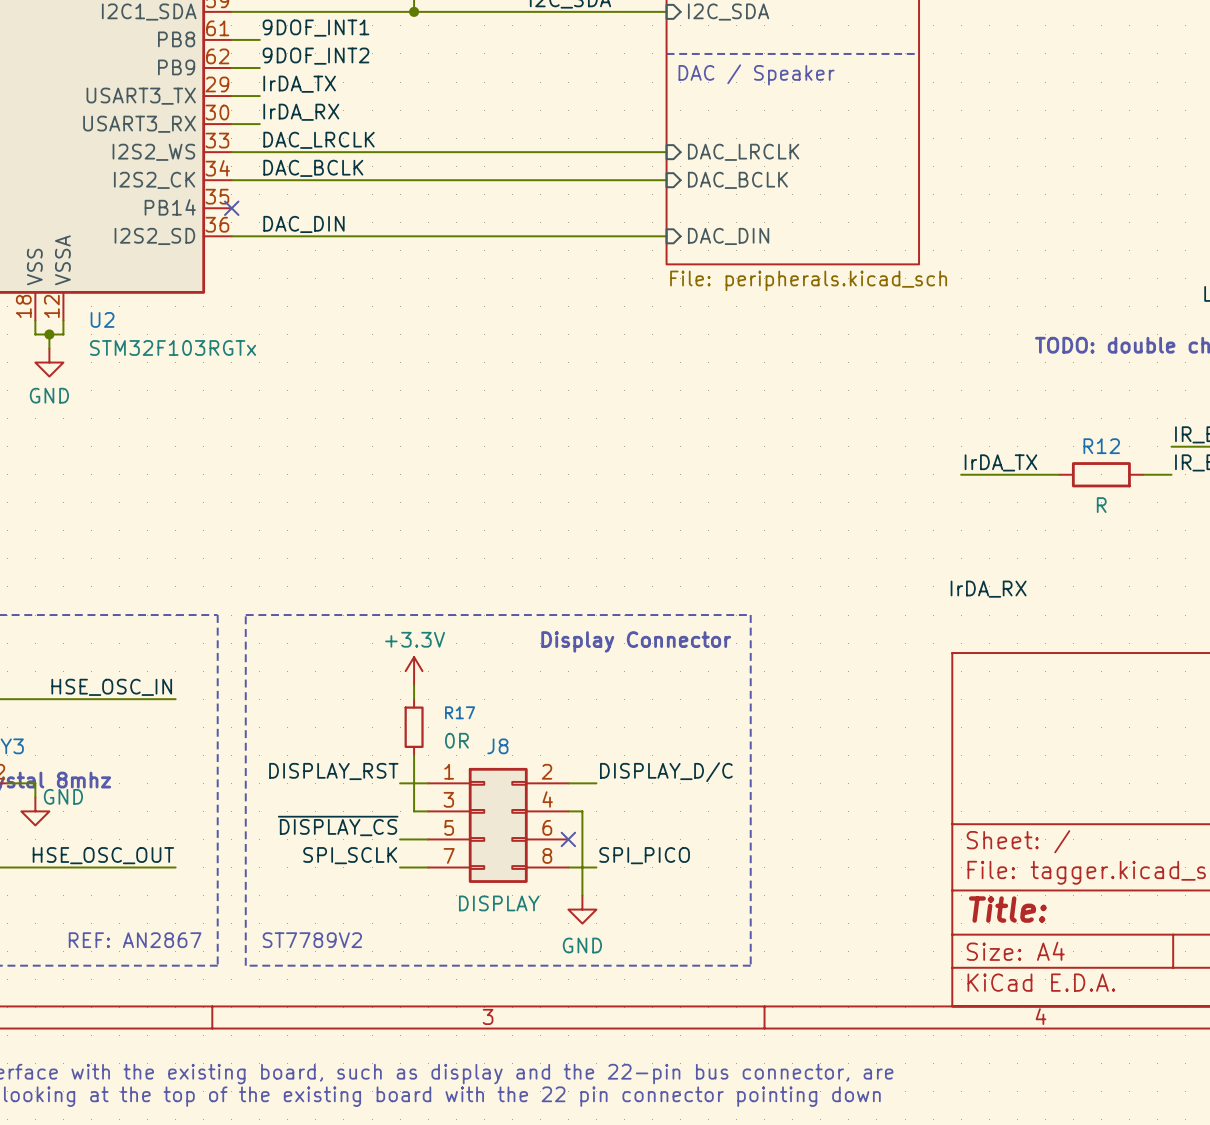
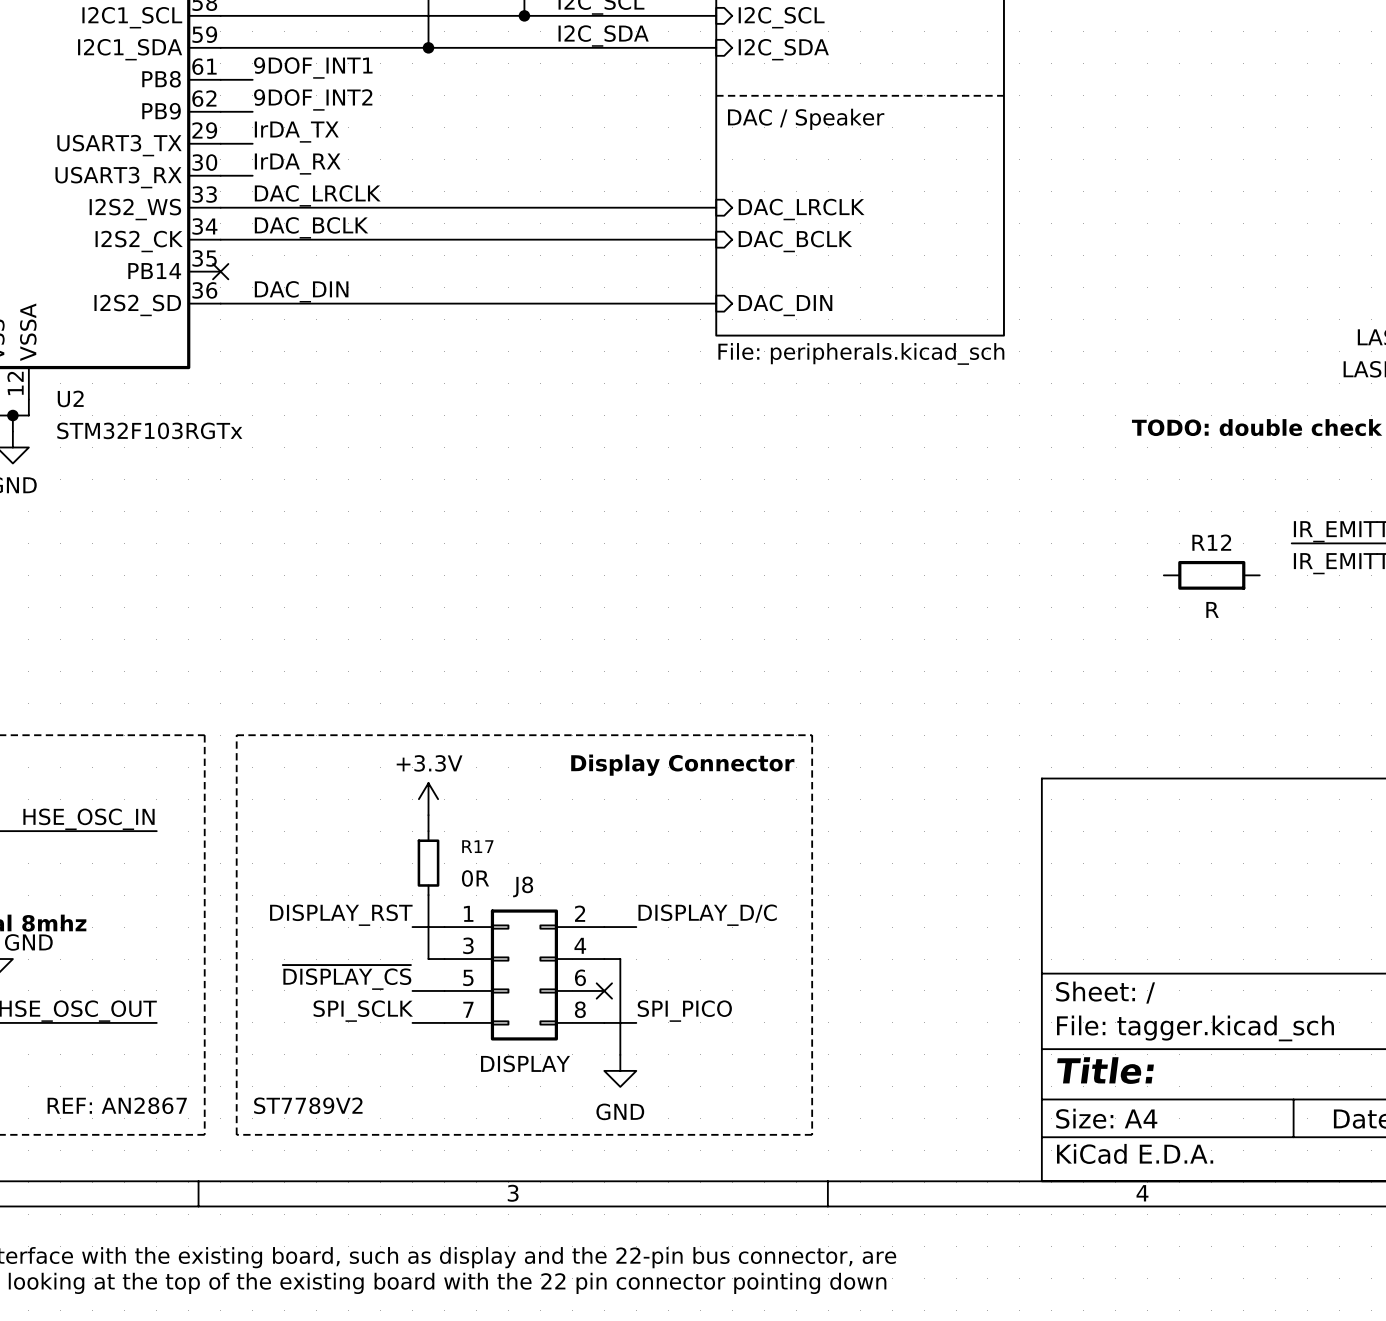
label: IrDA_TX (1000, 462) -> none
wire: (961, 474) (1059, 474) -> none
wire: (1143, 474) (1171, 474) -> none
label: IrDA_RX (988, 589) -> none

